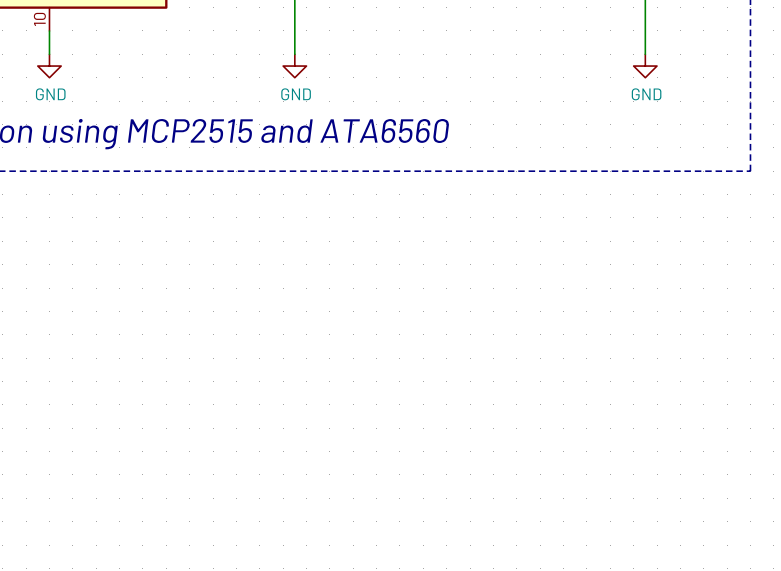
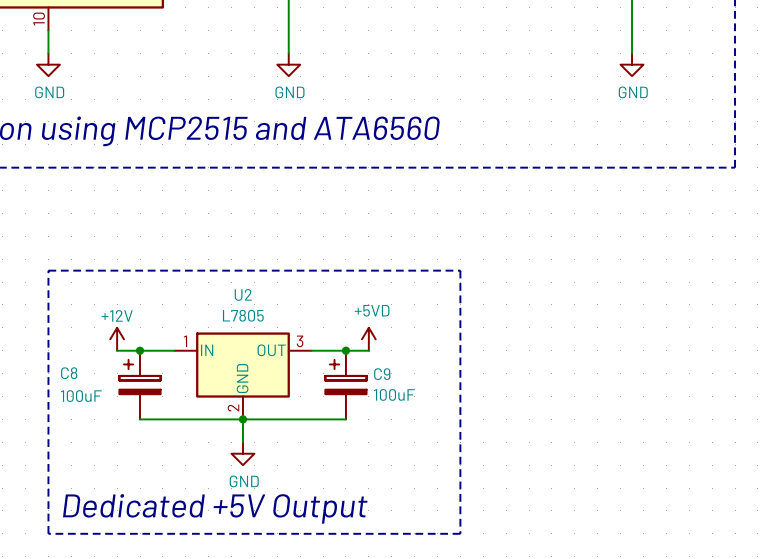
line: none -> (48, 270) (48, 533) (460, 533) (460, 270) (48, 270)
power symbol: none -> +12V (117, 339)
power symbol: none -> +5VD (368, 339)
wire: none -> (117, 350) (174, 350)
junction: none -> (140, 350)
wire: none -> (311, 350) (368, 350)
junction: none -> (345, 350)
U2: none -> L7805 (242, 375)
C8: none -> 100uF (140, 385)
C9: none -> 100uF (345, 385)
wire: none -> (140, 419) (345, 419)
wire: none -> (242, 419) (242, 442)
junction: none -> (242, 419)
power symbol: none -> GND (242, 453)
text: none -> Dedicated +5V Output (215, 508)

